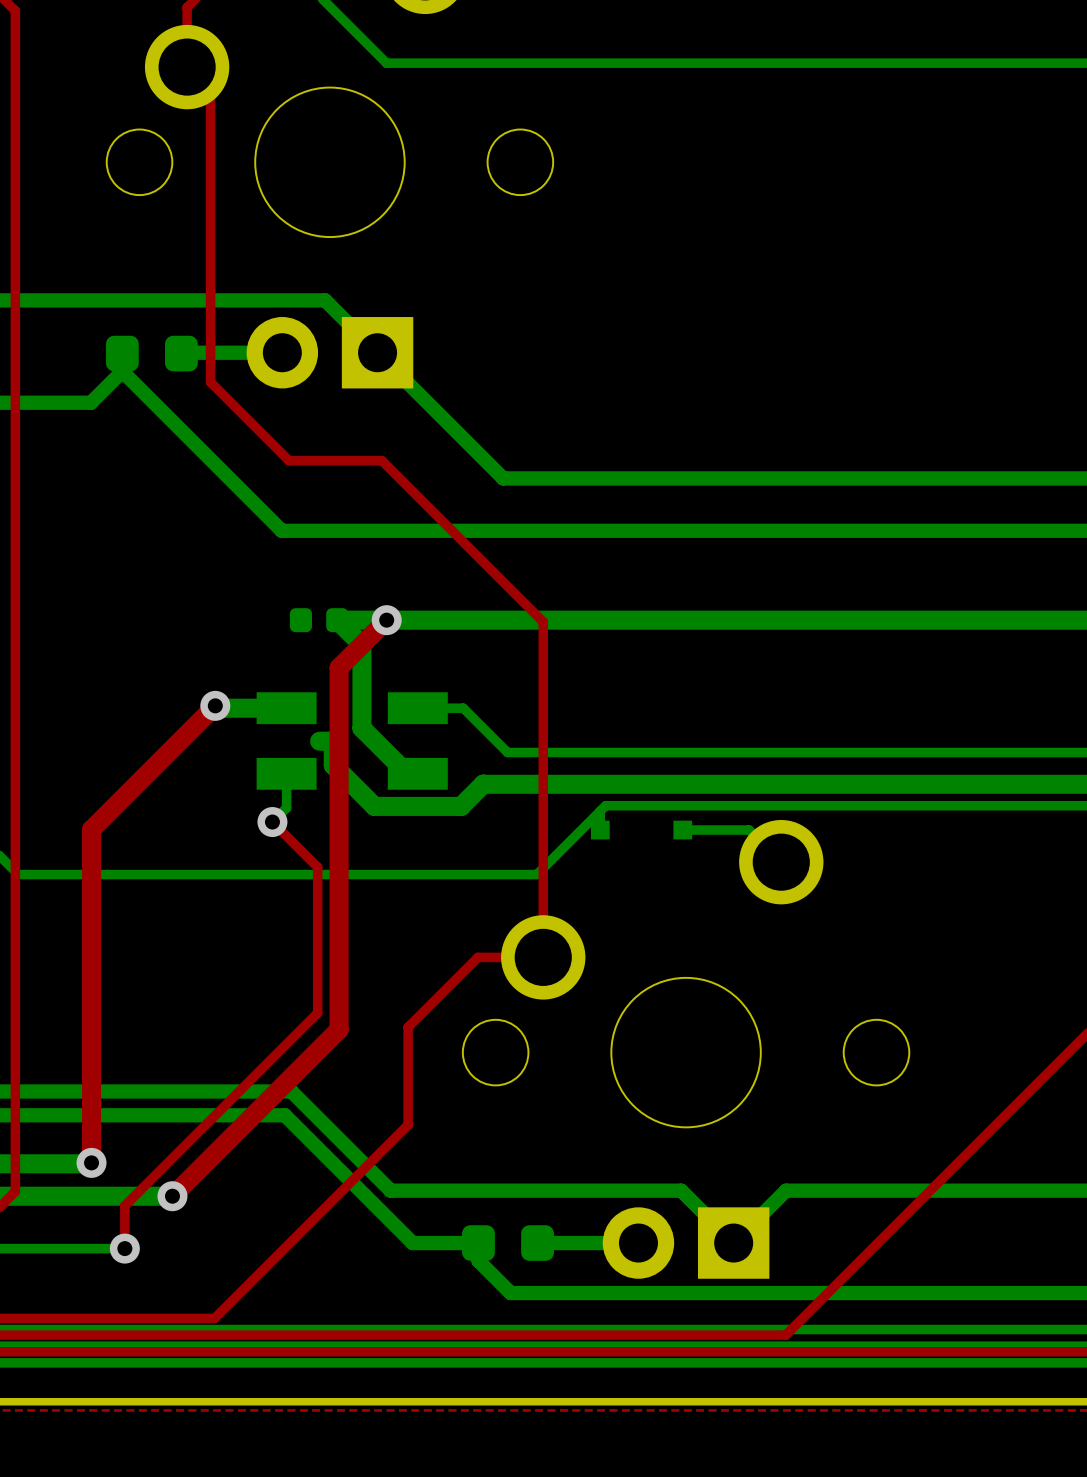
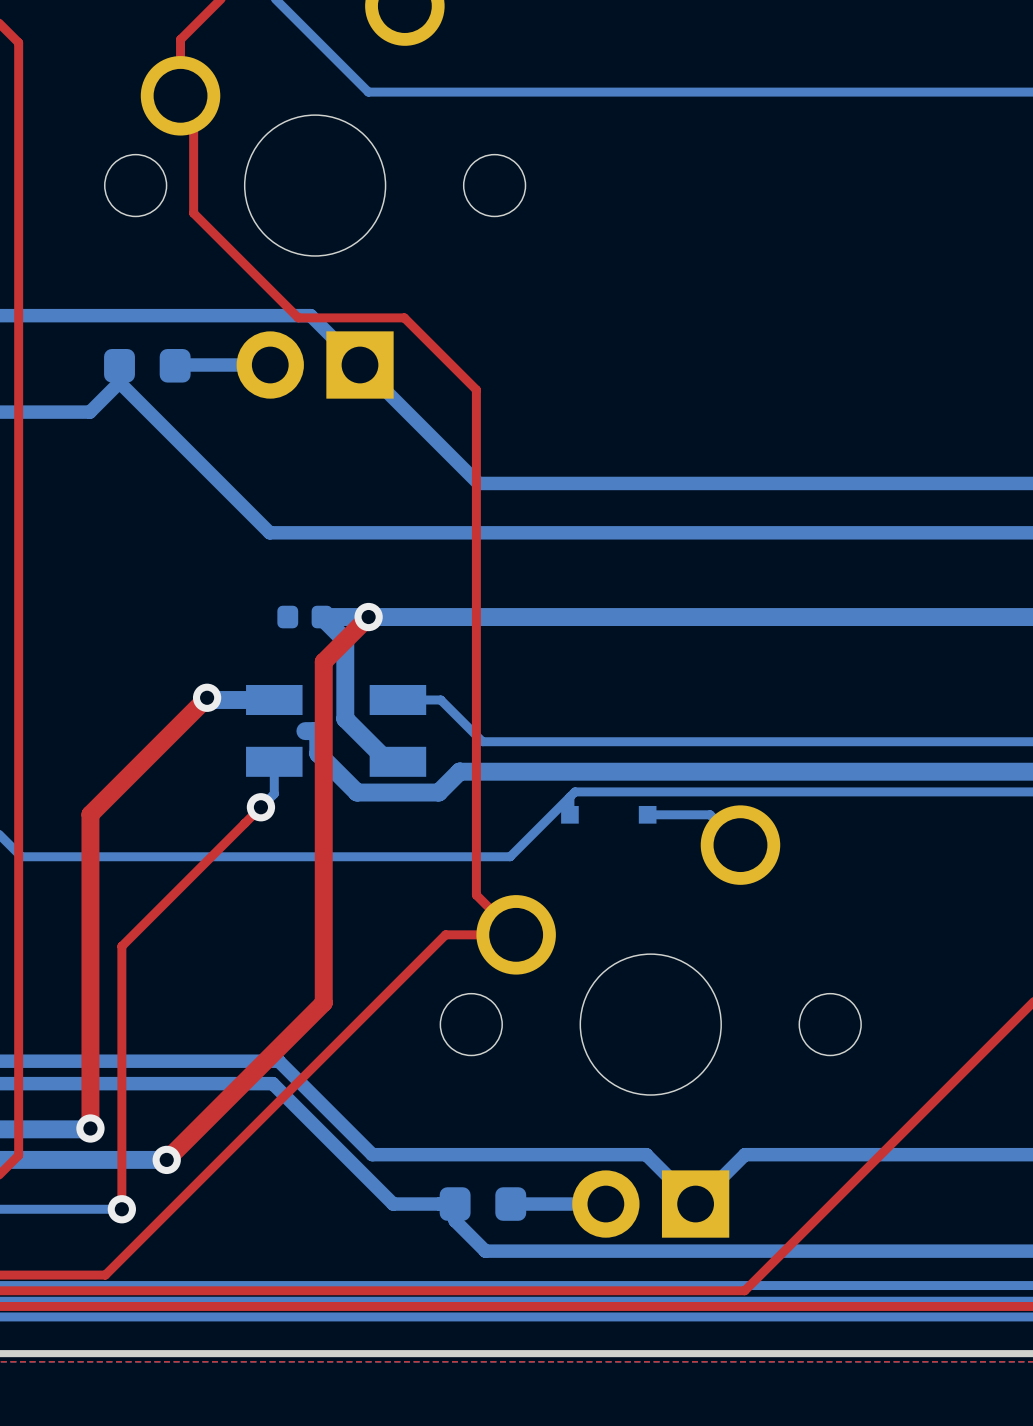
top track: (201, 80) (210, 90) (210, 382) (289, 460) (381, 460) (543, 621) (543, 957) -> (193, 108) (193, 213) (298, 317) (404, 317) (476, 389) (476, 895) (516, 934)
top track: (272, 822) (317, 867) (317, 1012) (124, 1205) -> (260, 807) (121, 946) (121, 1168)
top track: (477, 957) (408, 1027) (408, 1124) (214, 1318) (107, 1318) -> (454, 934) (445, 934) (105, 1275)

